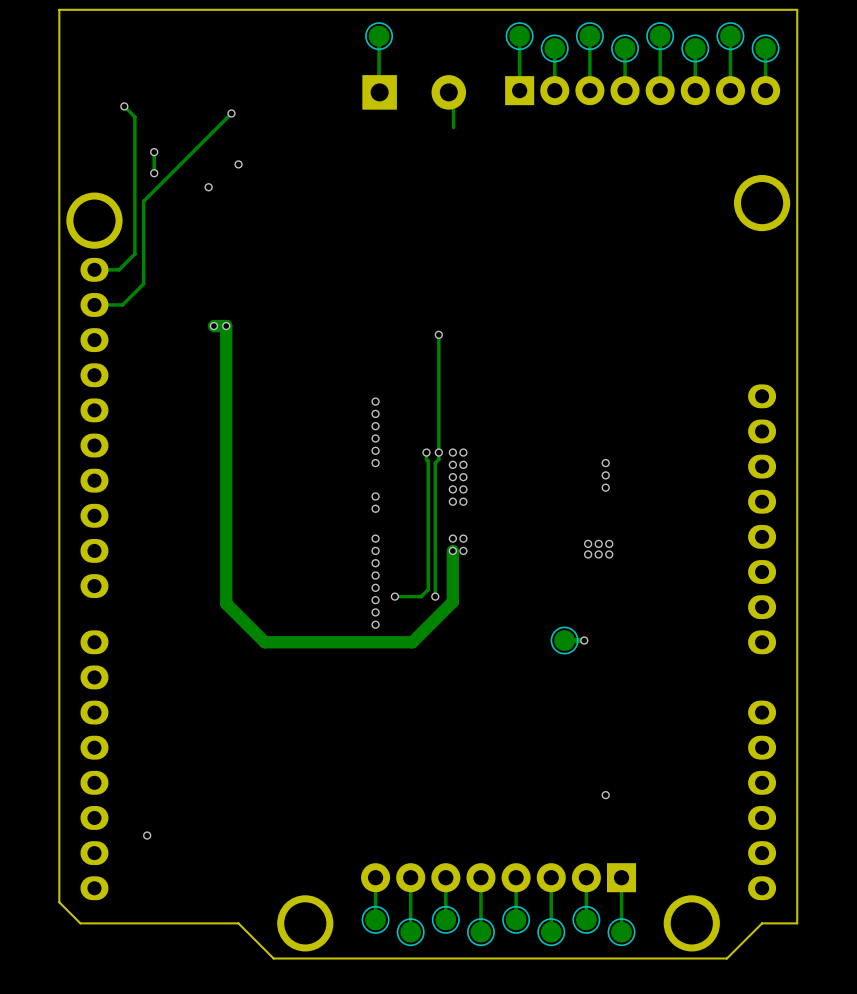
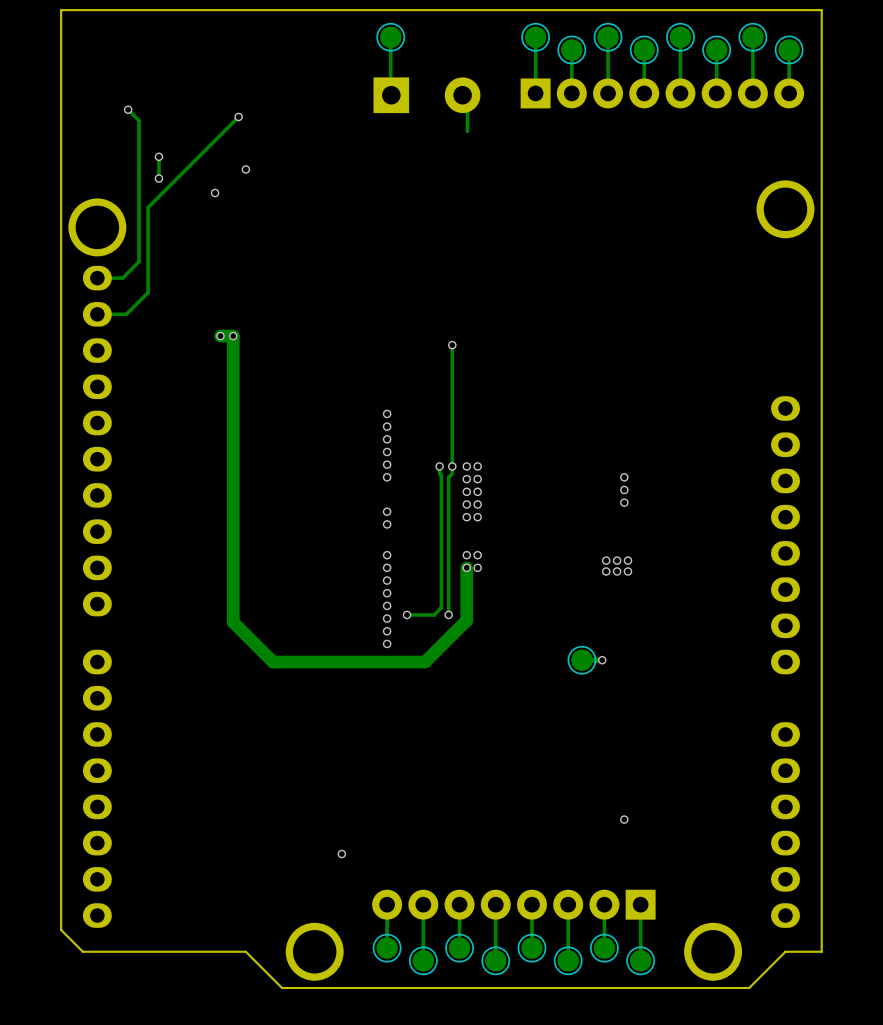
via: none -> (341, 853)
via: (147, 835) -> none

